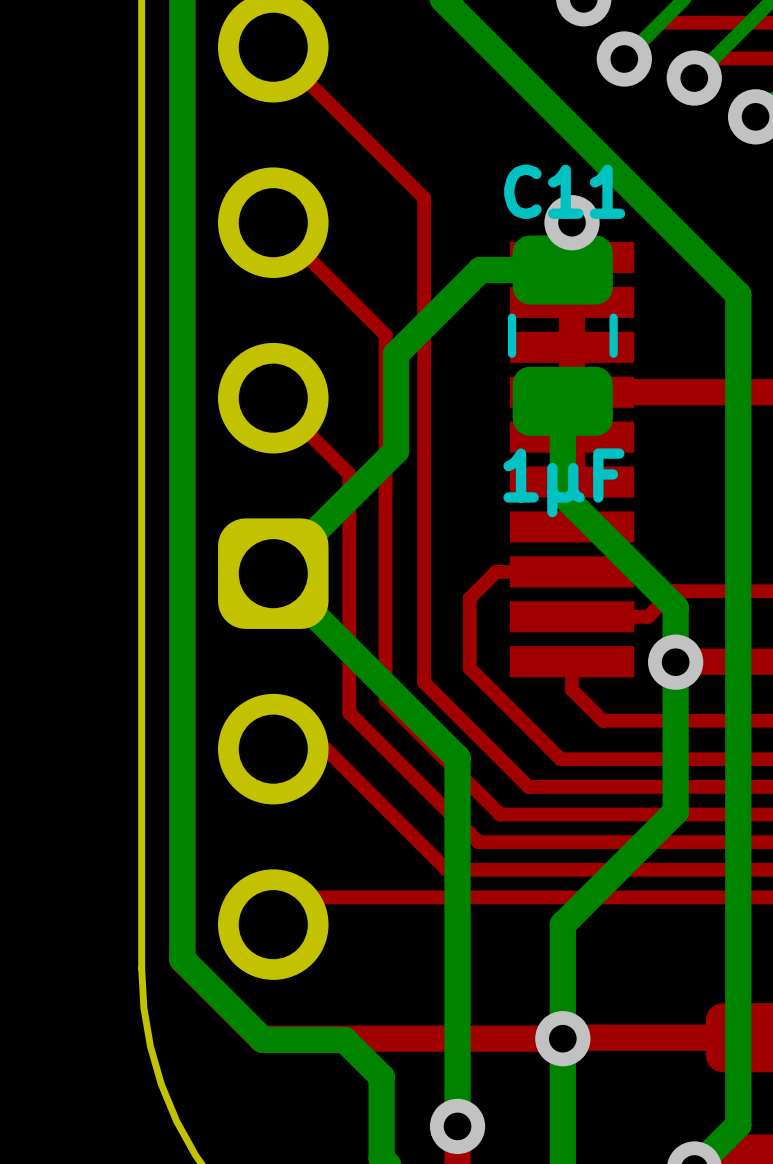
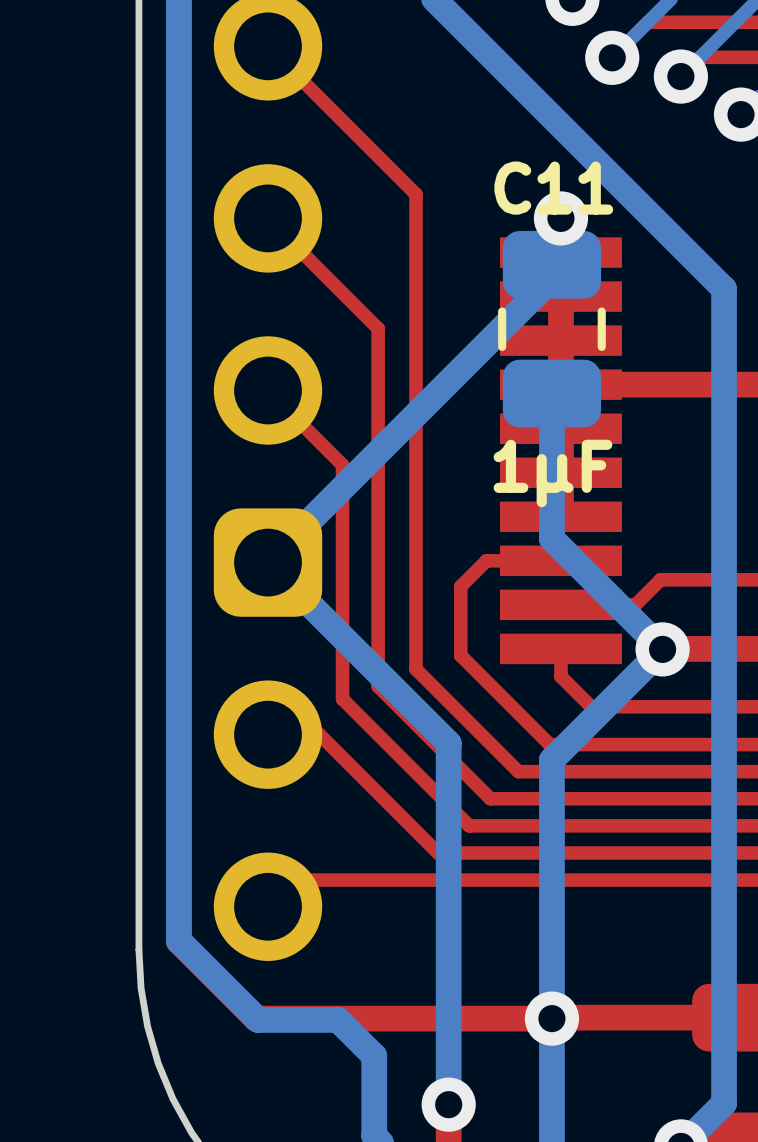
bottom track: (562, 270) (480, 270) (396, 354) (396, 450) -> (551, 278) (388, 442)
bottom track: (562, 494) (675, 607) (675, 811) (562, 924) -> (551, 485) (551, 538) (662, 649) (551, 760) (551, 906)

